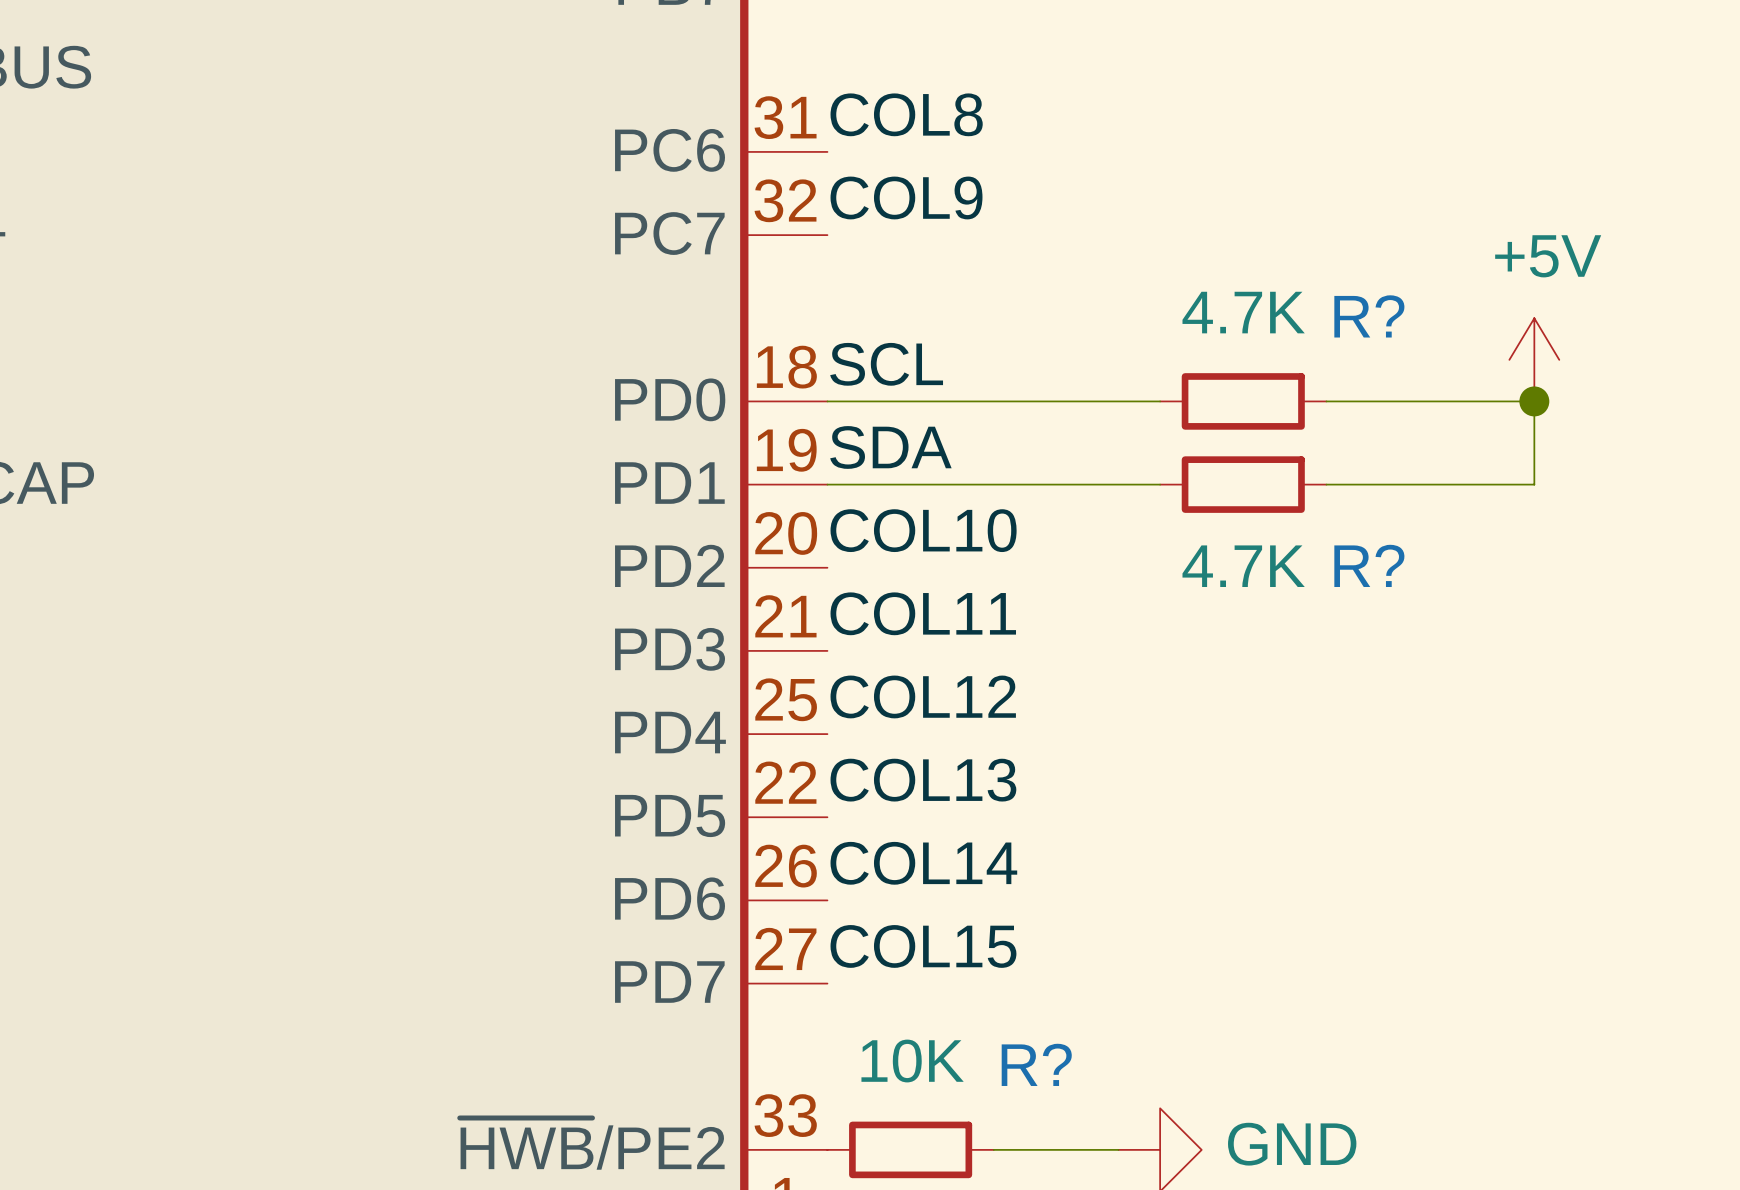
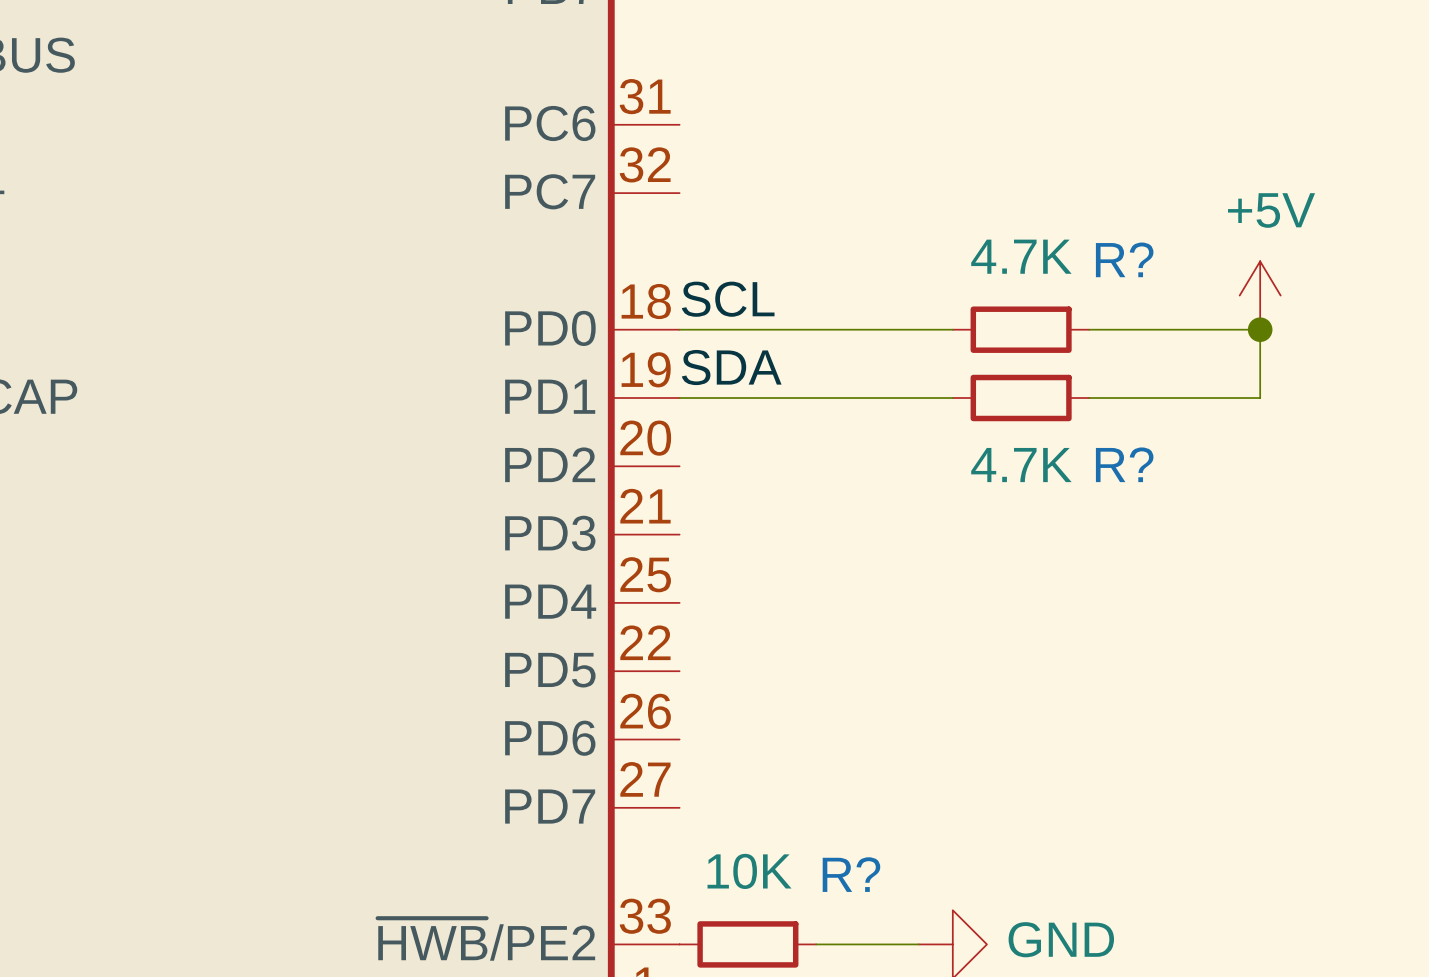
label: COL8 (906, 114) -> none
label: COL9 (906, 197) -> none
label: COL10 (923, 530) -> none
label: COL11 (923, 613) -> none
label: COL12 (923, 696) -> none
label: COL13 (923, 780) -> none
label: COL14 (923, 863) -> none
label: COL15 (923, 946) -> none

